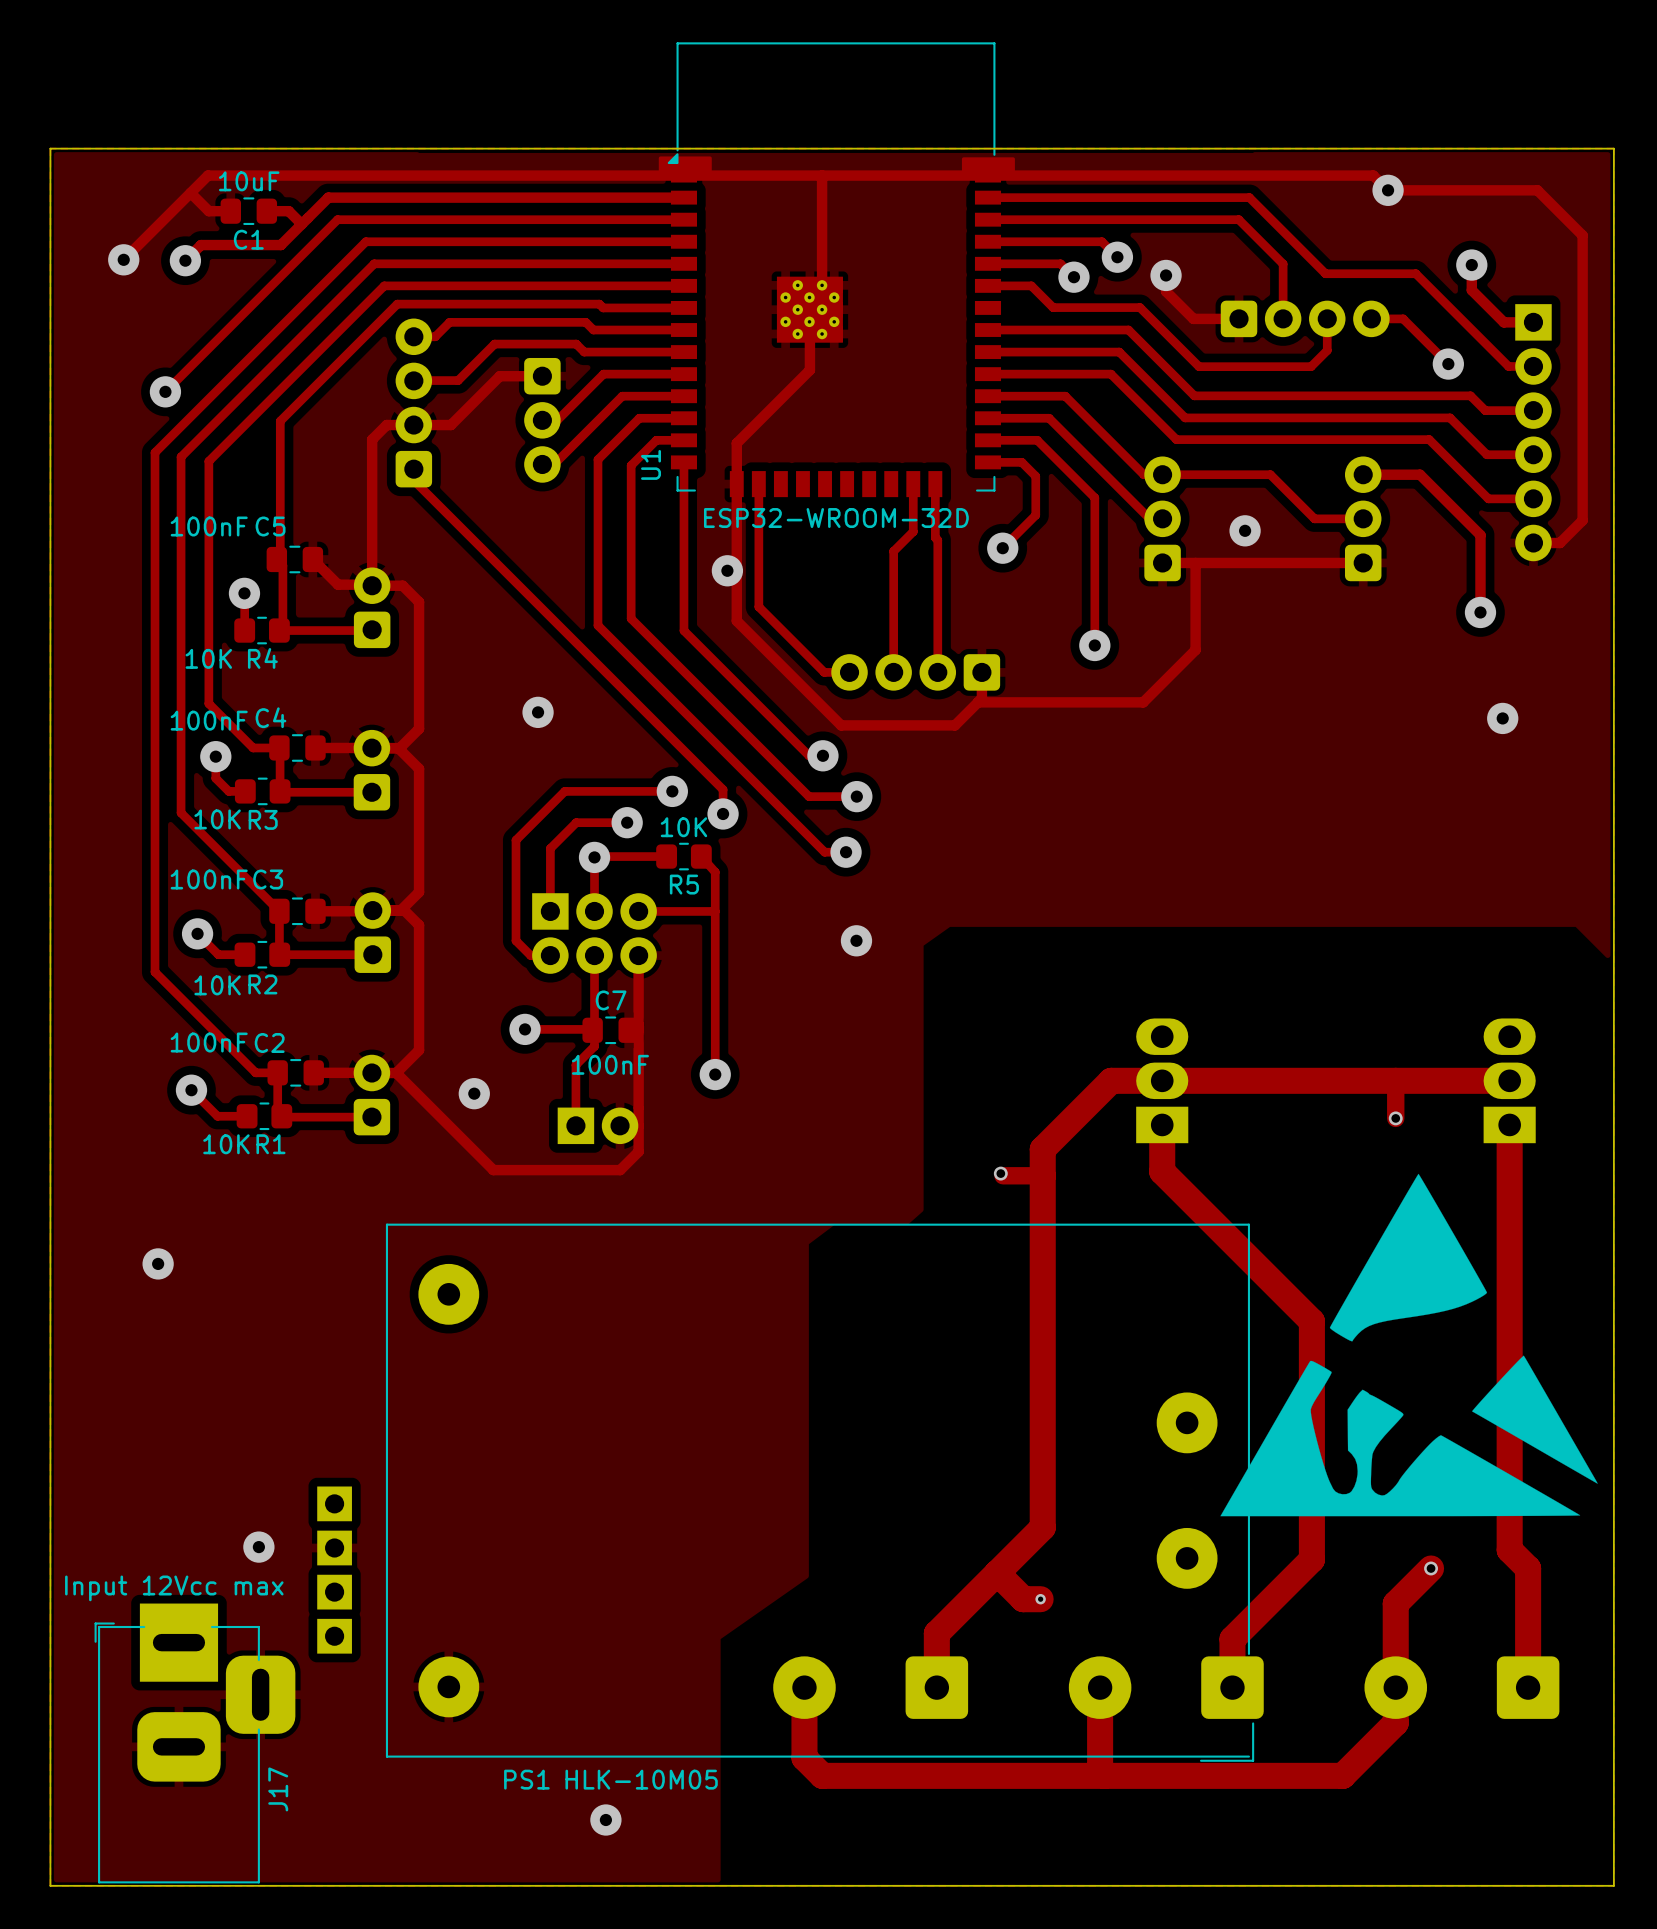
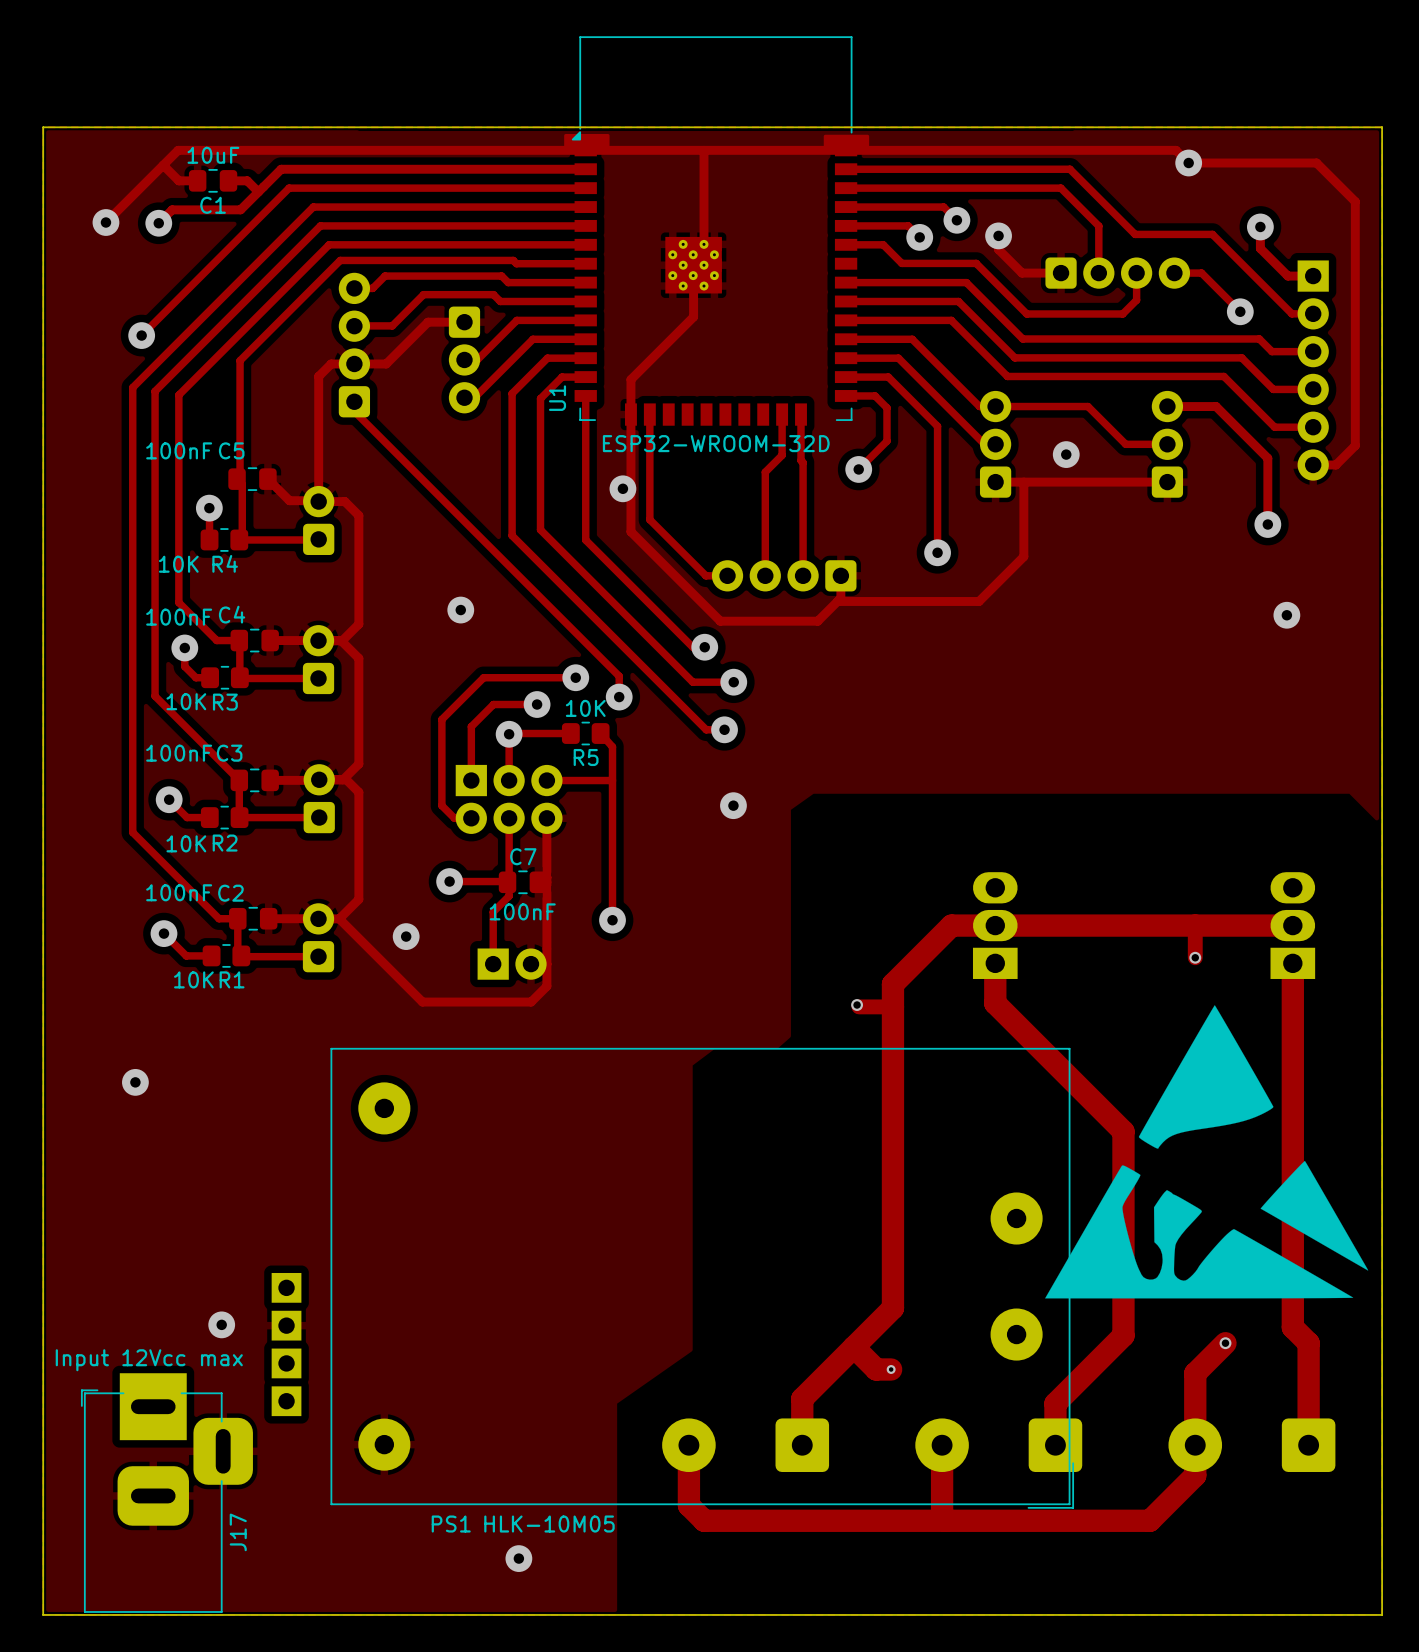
PS1 footprint: [385, 1223, 1255, 1762] -> [330, 1047, 1075, 1509]

